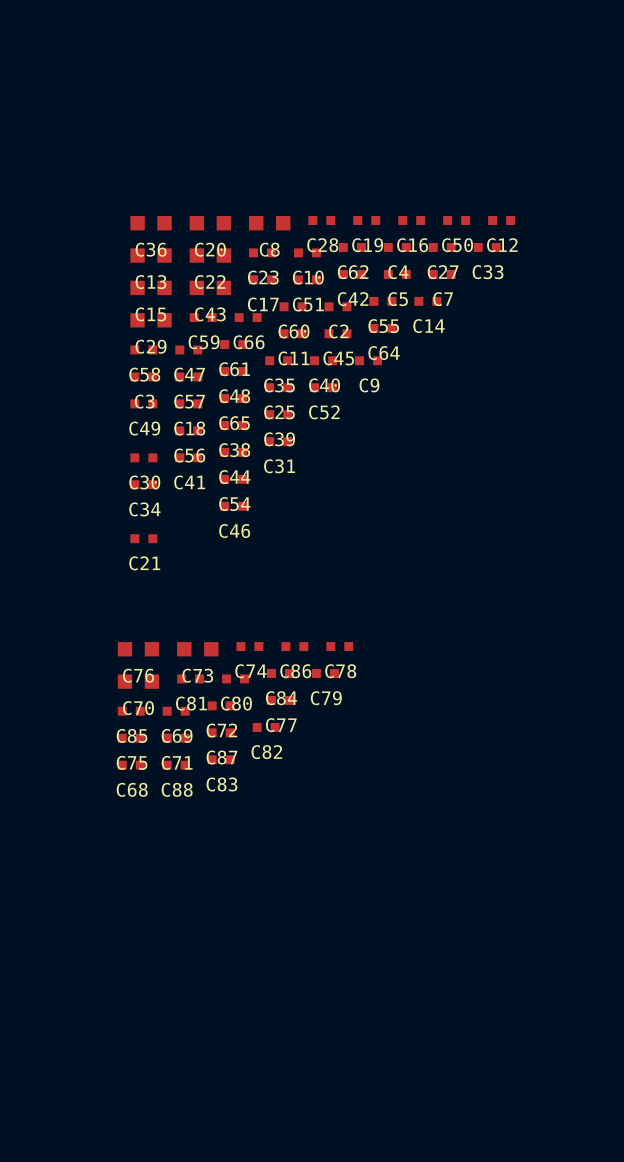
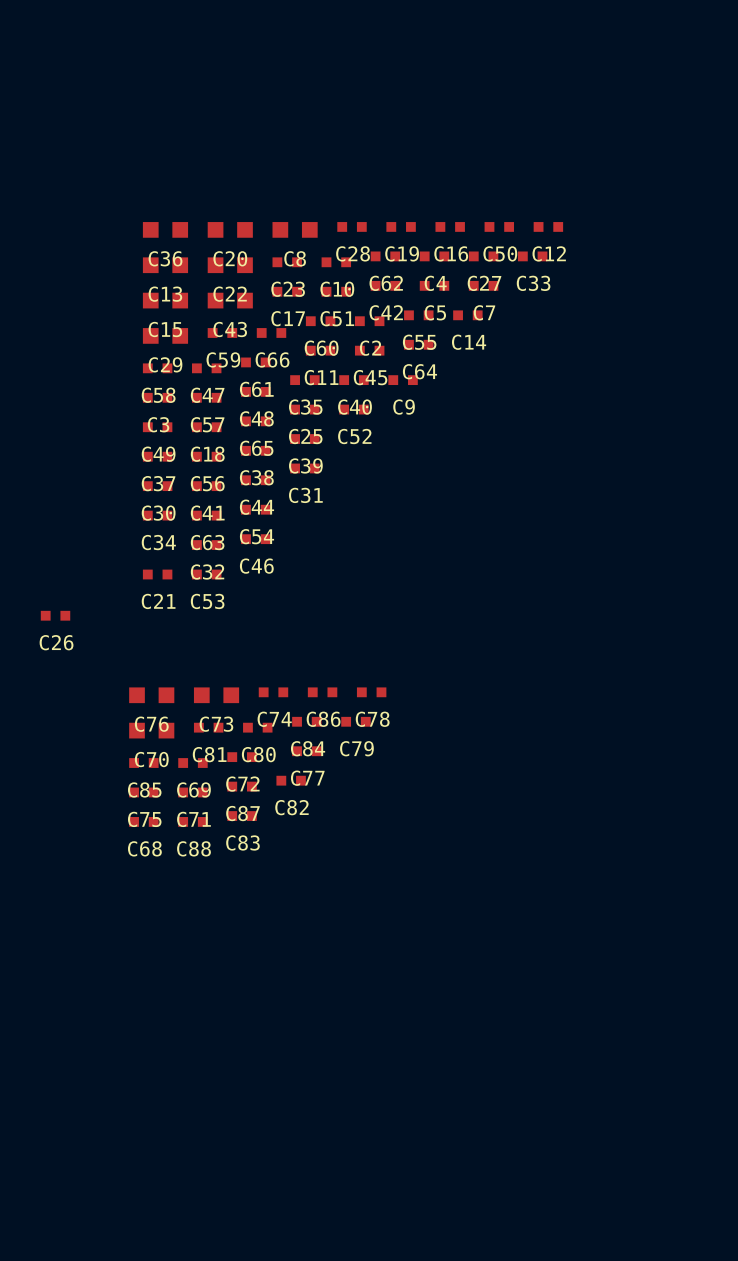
C37: none -> (157, 456)
C63: none -> (206, 515)
C32: none -> (206, 545)
C53: none -> (206, 574)
C26: none -> (55, 615)

